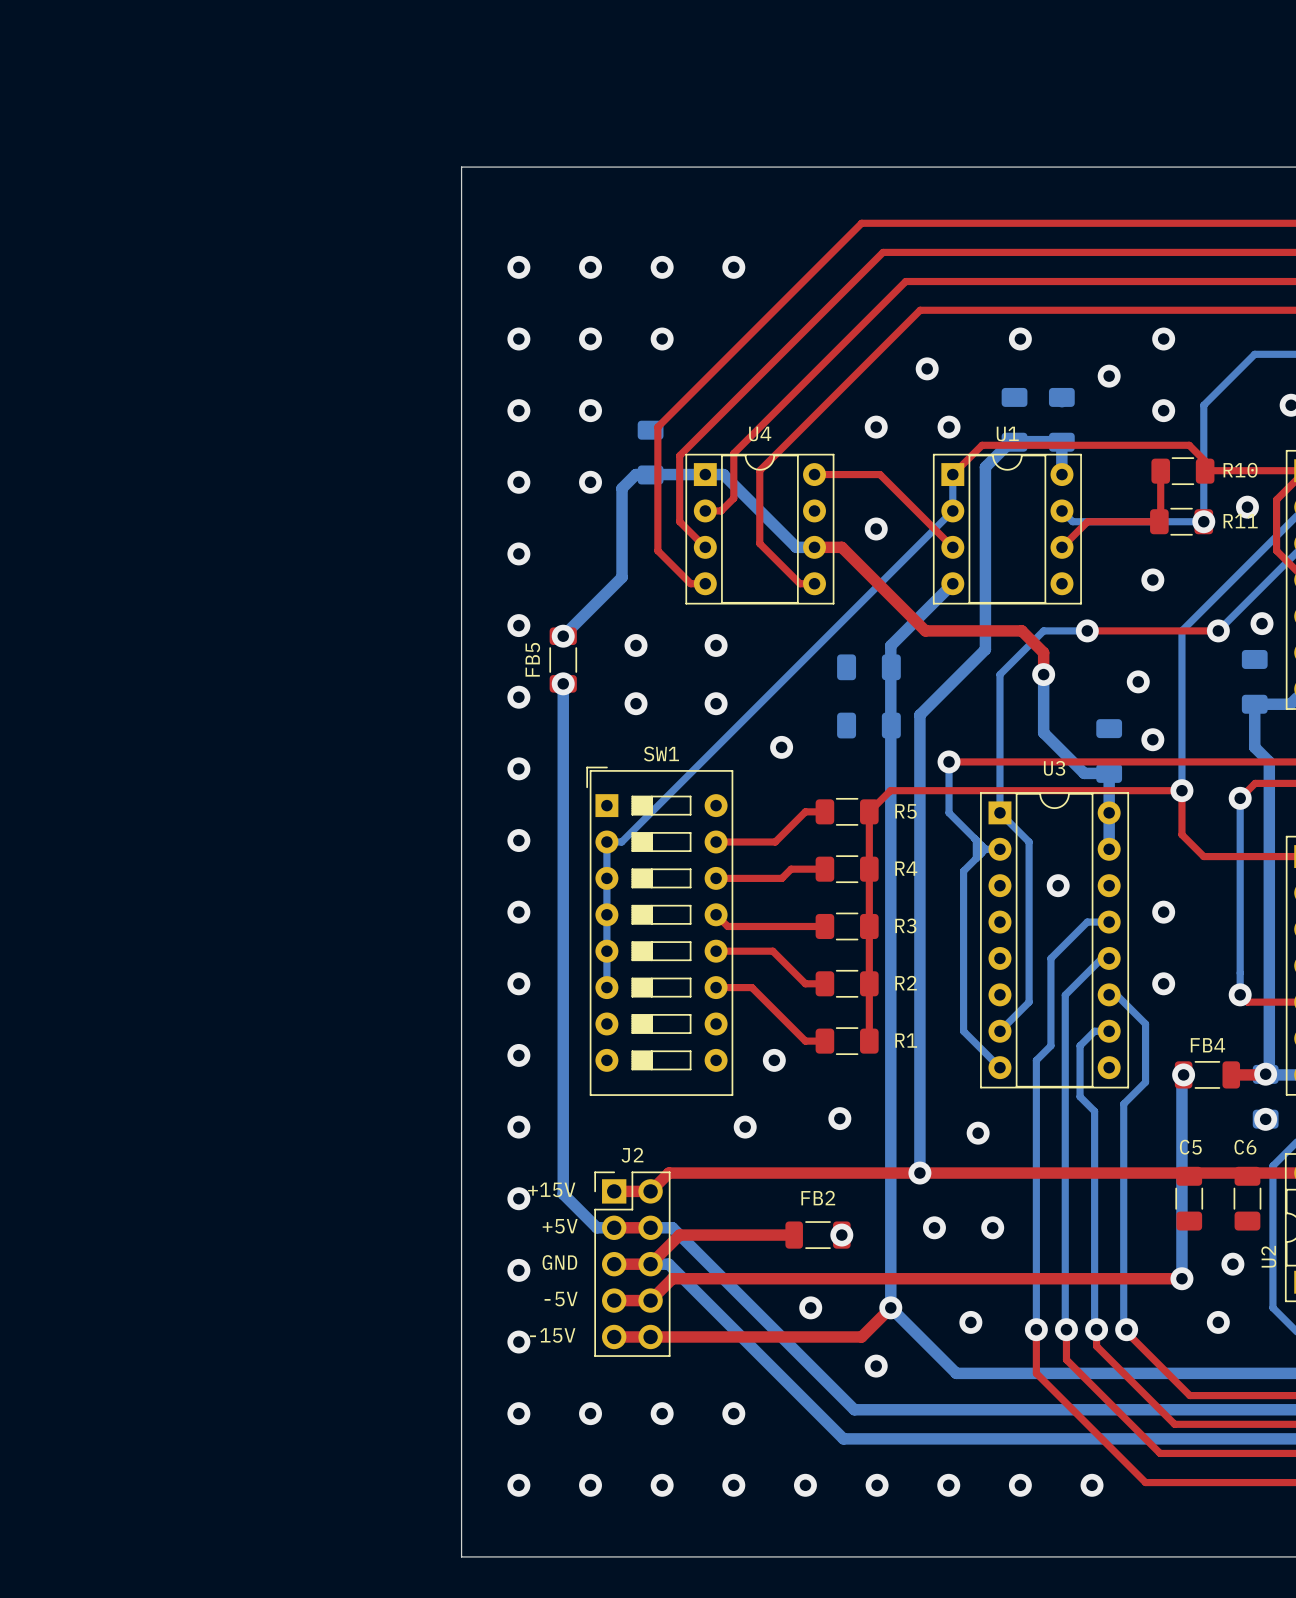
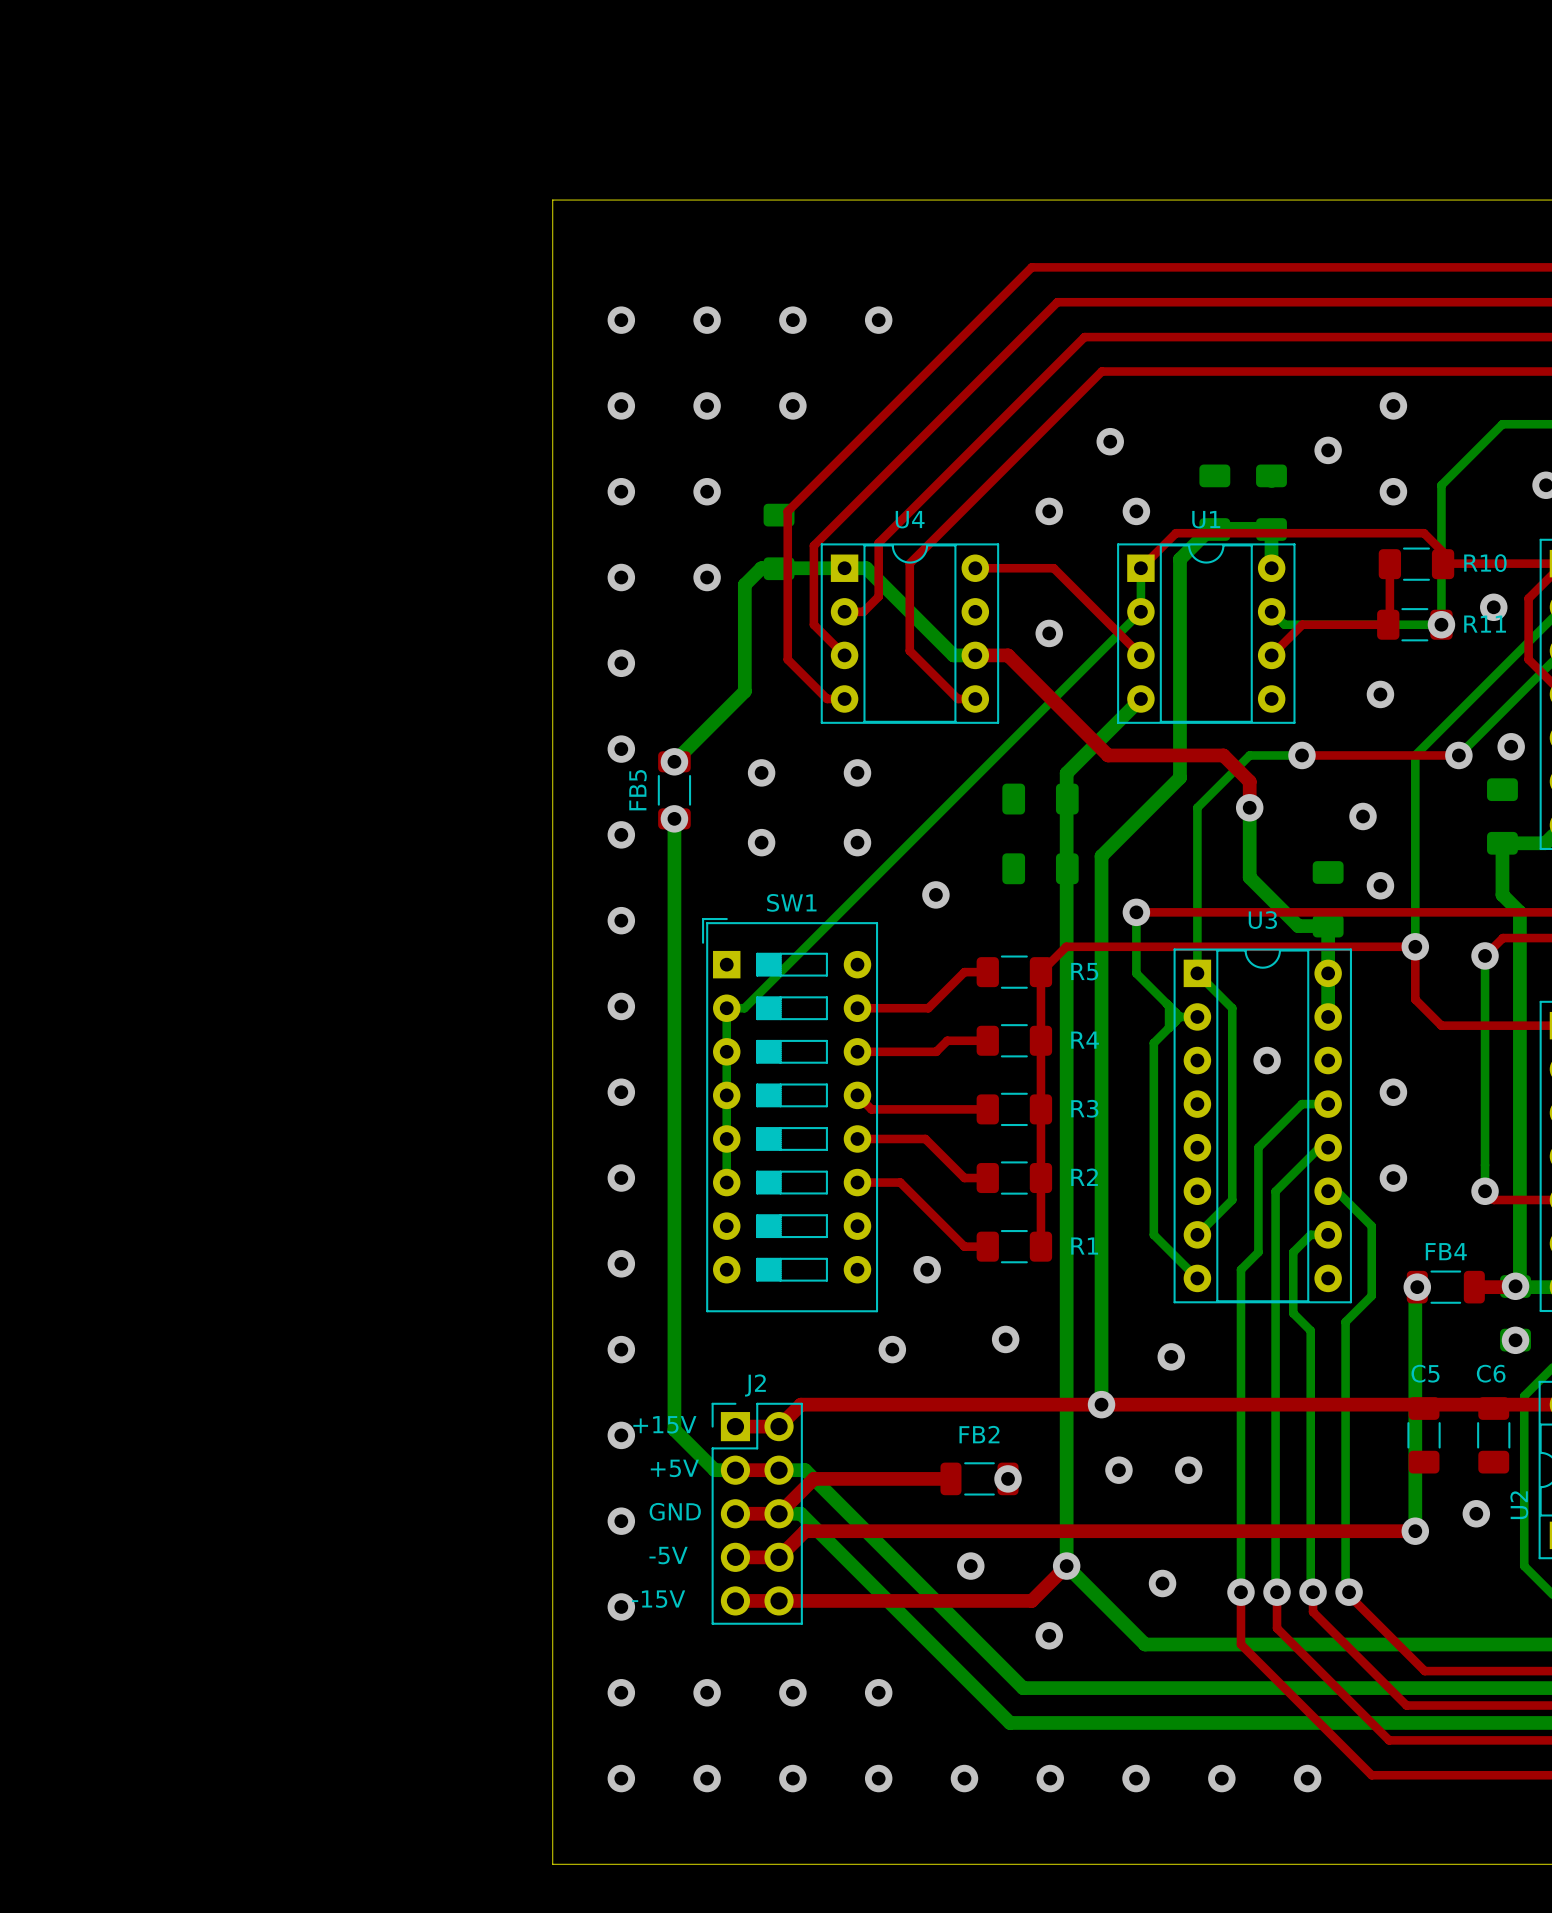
via: (1020, 339) -> none
via: (1218, 1322) -> none

